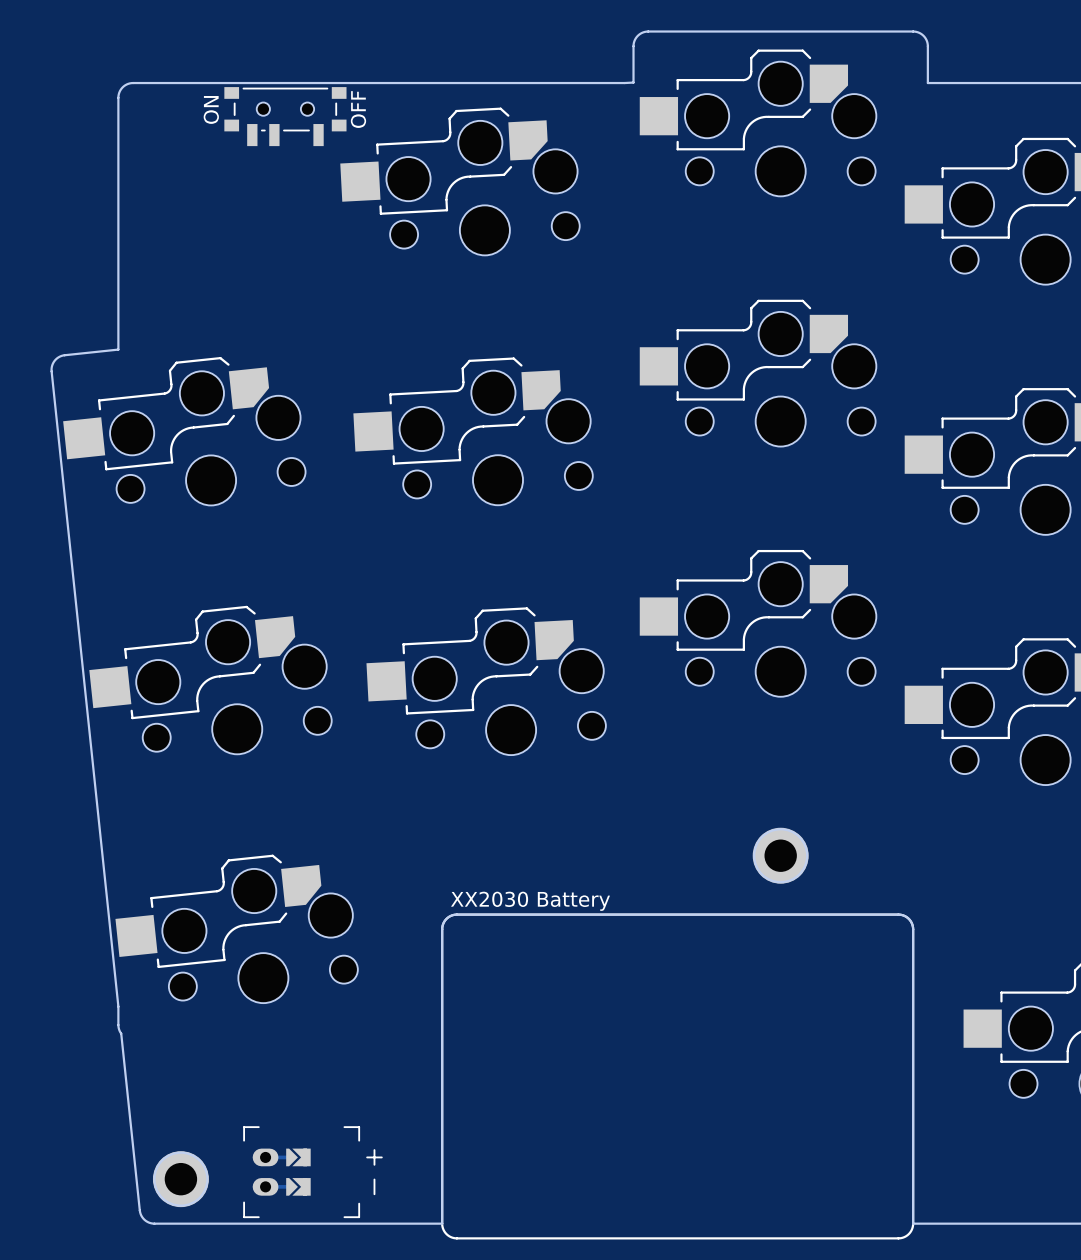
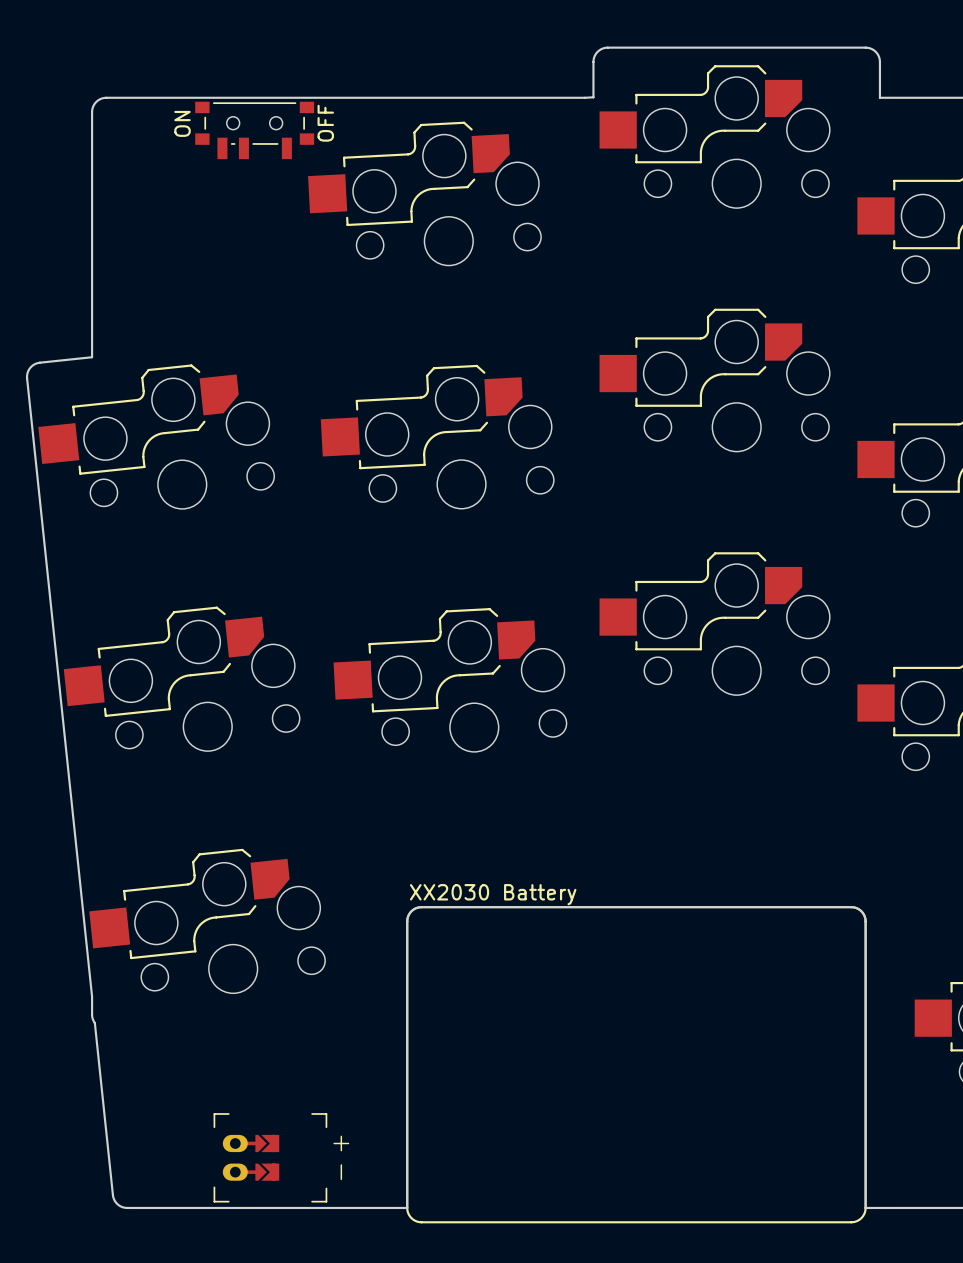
part: (780, 855) -> none
part: (180, 1179) -> none

